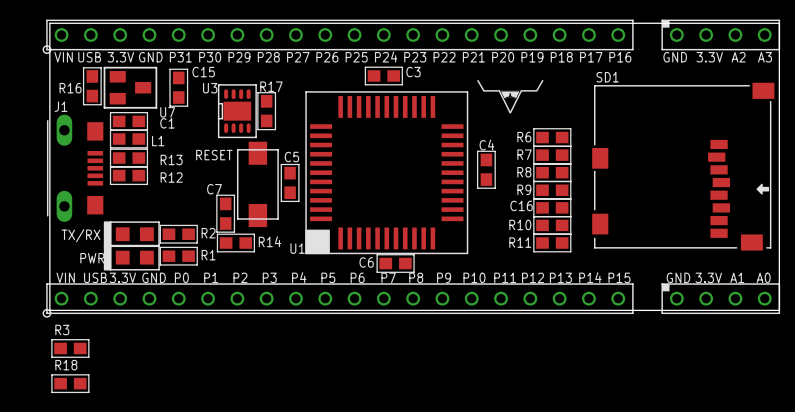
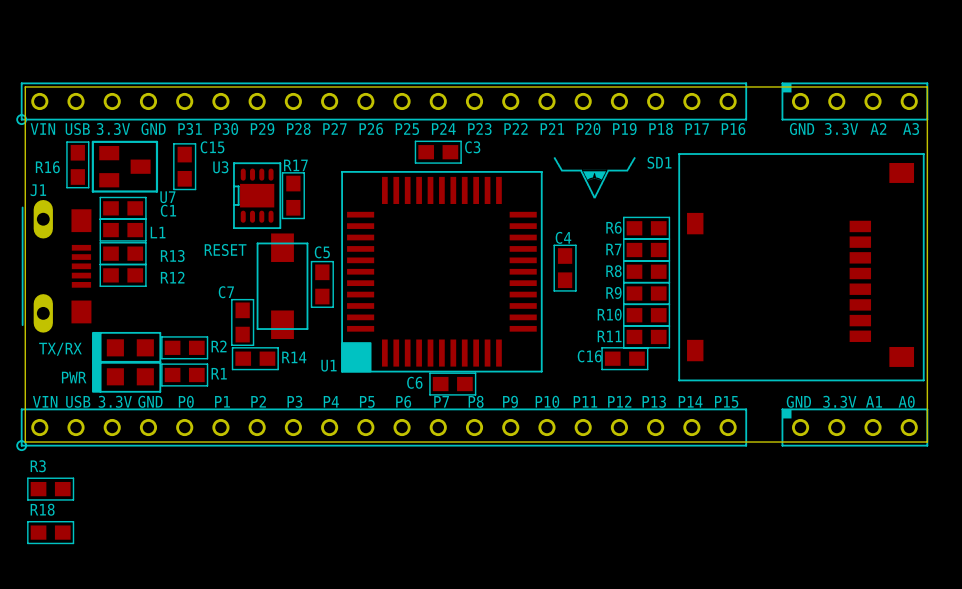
SD1 name position: SD1 (607, 77) -> SD1 (659, 162)
SD1 footprint: [592, 82, 775, 251] -> [678, 153, 925, 382]
C16 name: C16 (521, 205) -> R10 (609, 314)
R10 name: R10 (520, 224) -> R11 (609, 336)
C16: none -> (624, 358)
R11: (552, 243) -> none

